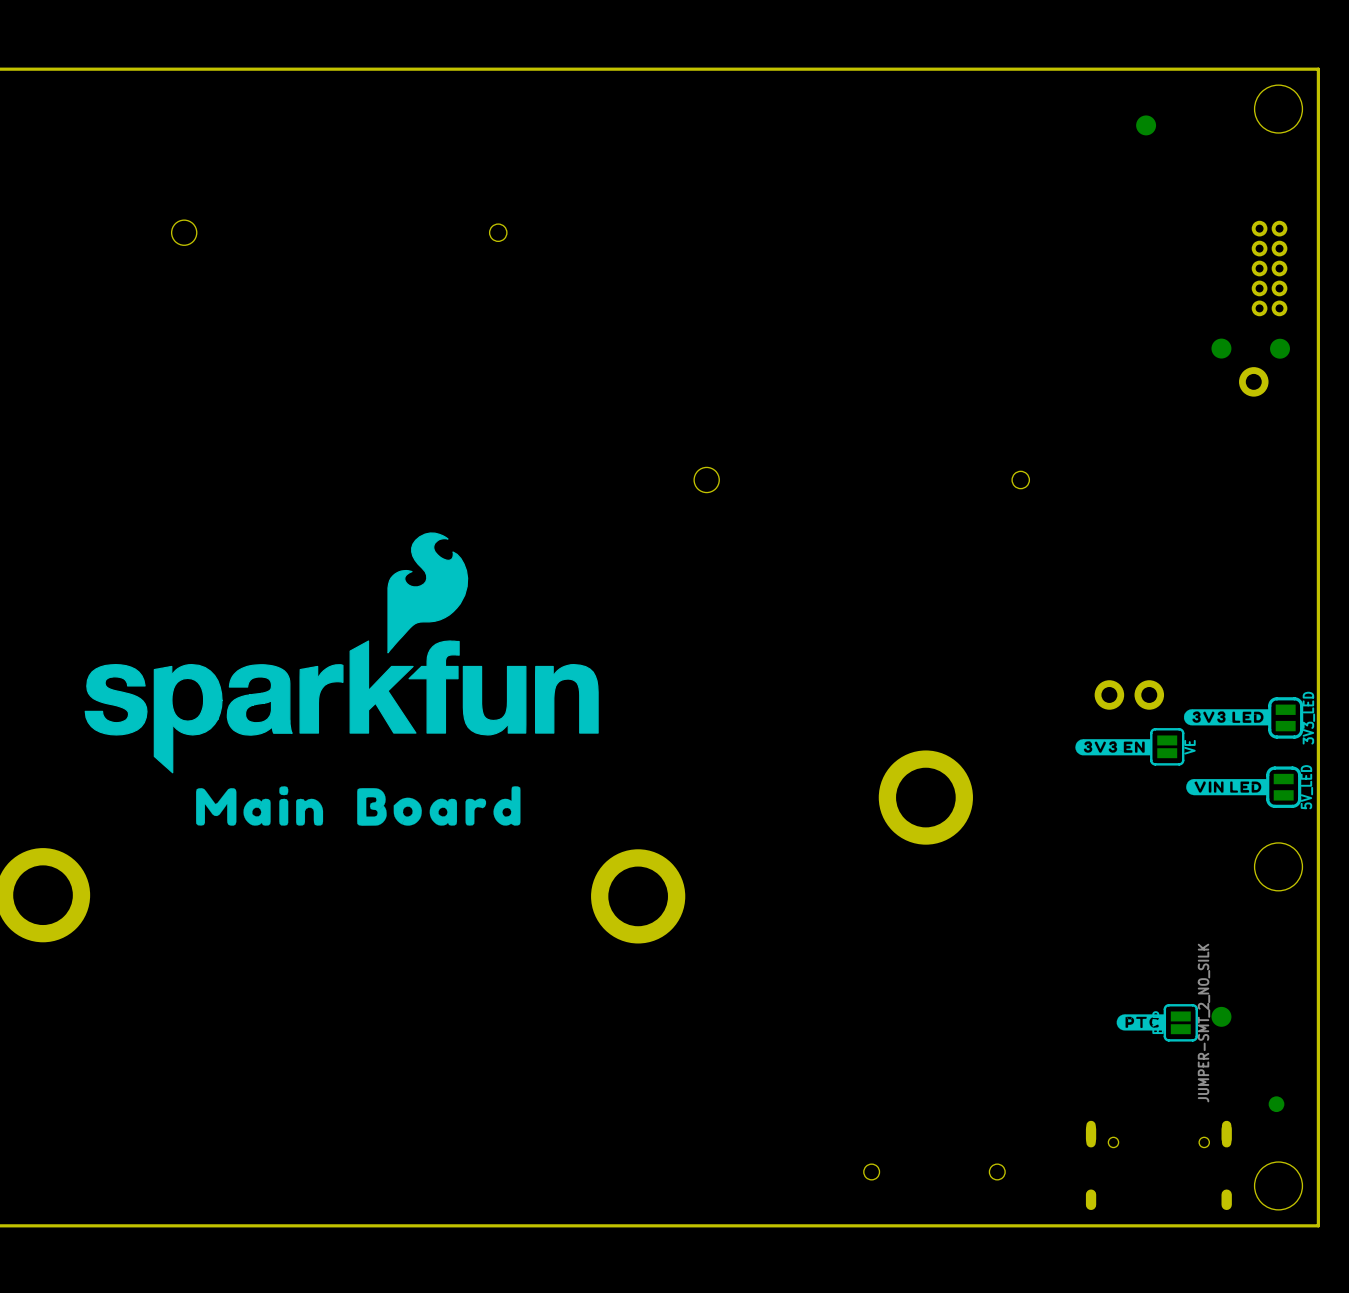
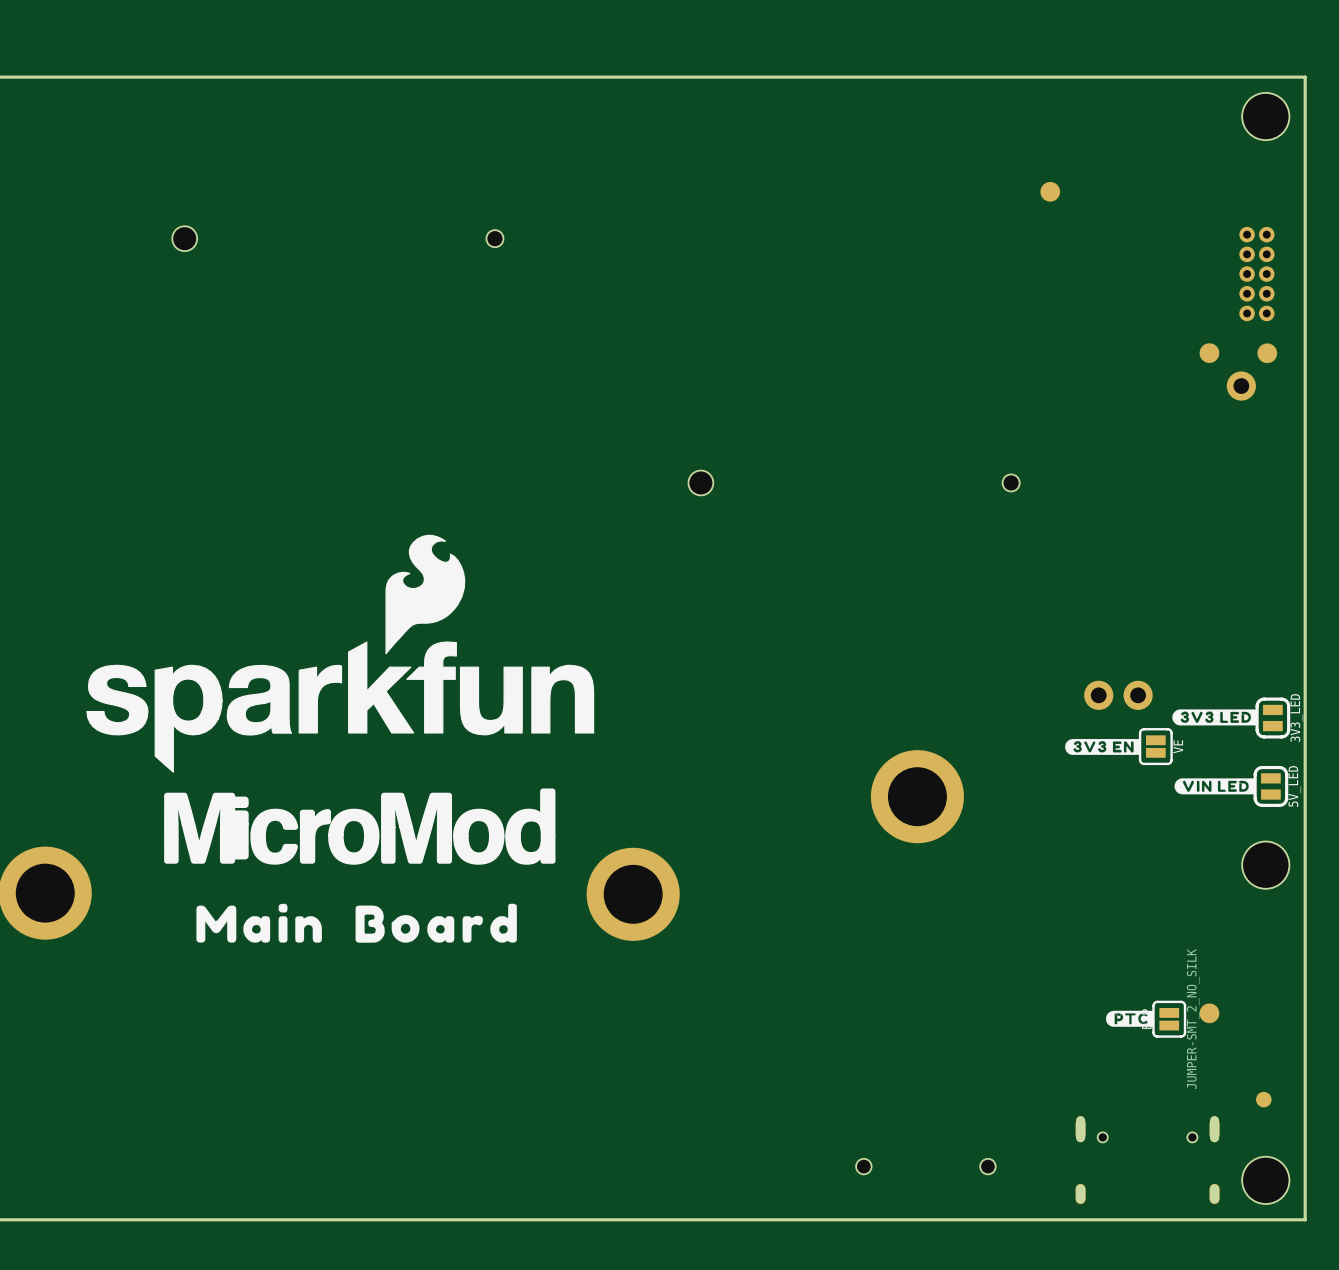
part position: (1146, 125) -> (1050, 191)
drawing: none -> [164, 788, 556, 865]
drawing position: (259, 805) -> (259, 923)
drawing position: (438, 806) -> (436, 923)

